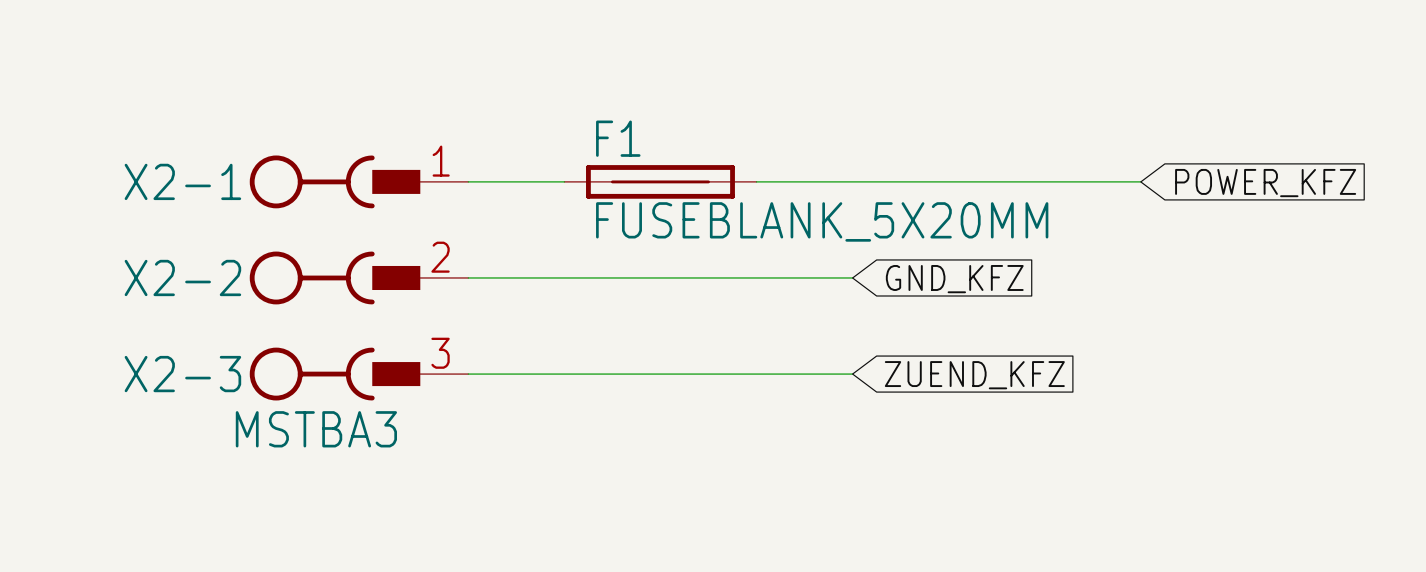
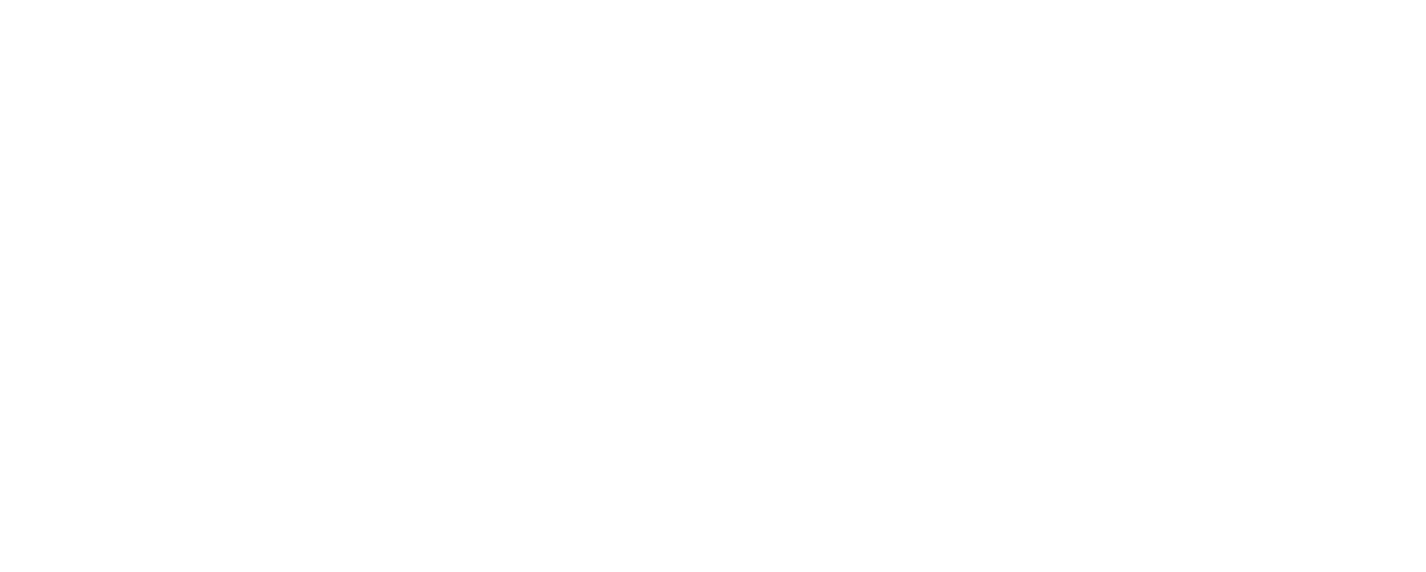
X2-1: (359, 181) -> none
wire: (468, 181) (564, 181) -> none
F1: FUSEBLANK_5X20MM (660, 181) -> none
wire: (756, 181) (1140, 181) -> none
global label: POWER_KFZ (1265, 183) -> none
X2-2: (359, 277) -> none
wire: (468, 277) (852, 277) -> none
global label: GND_KFZ (954, 279) -> none
X2-3: MSTBA3 (359, 374) -> none
wire: (468, 374) (852, 374) -> none
global label: ZUEND_KFZ (974, 375) -> none

